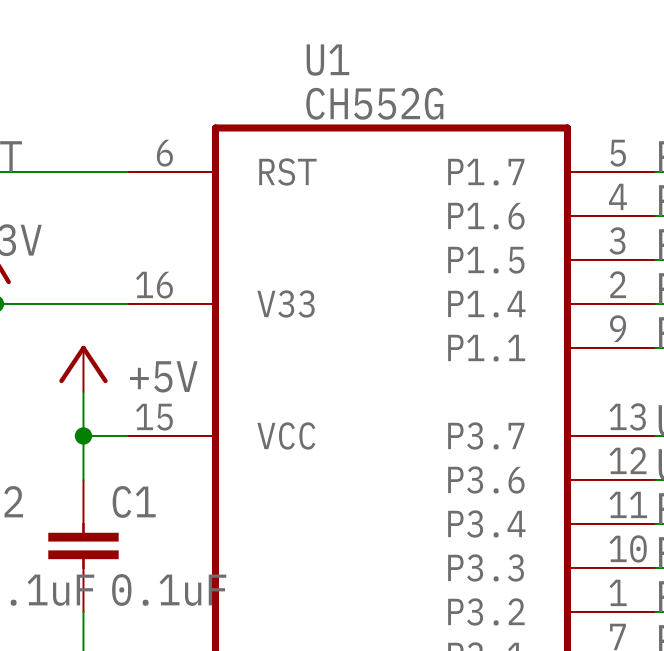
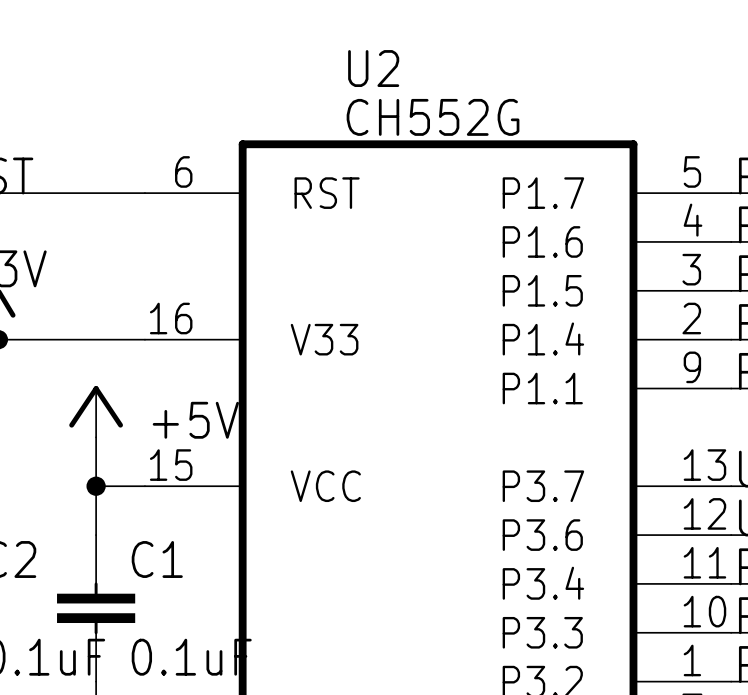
U1 name: U1 (327, 60) -> U2 (373, 68)

